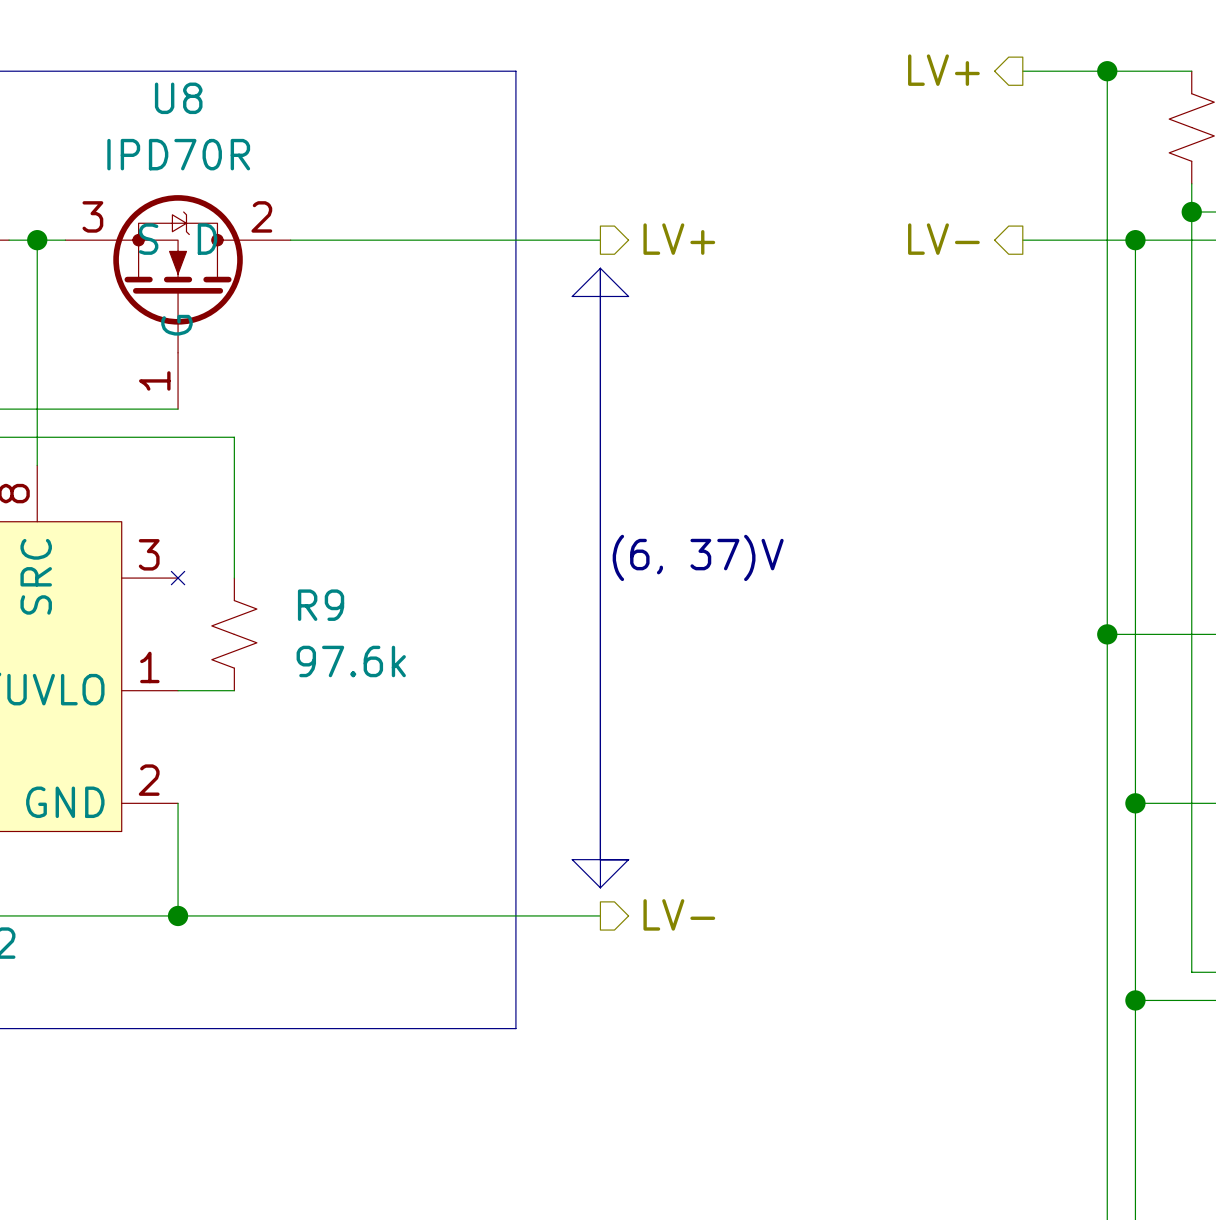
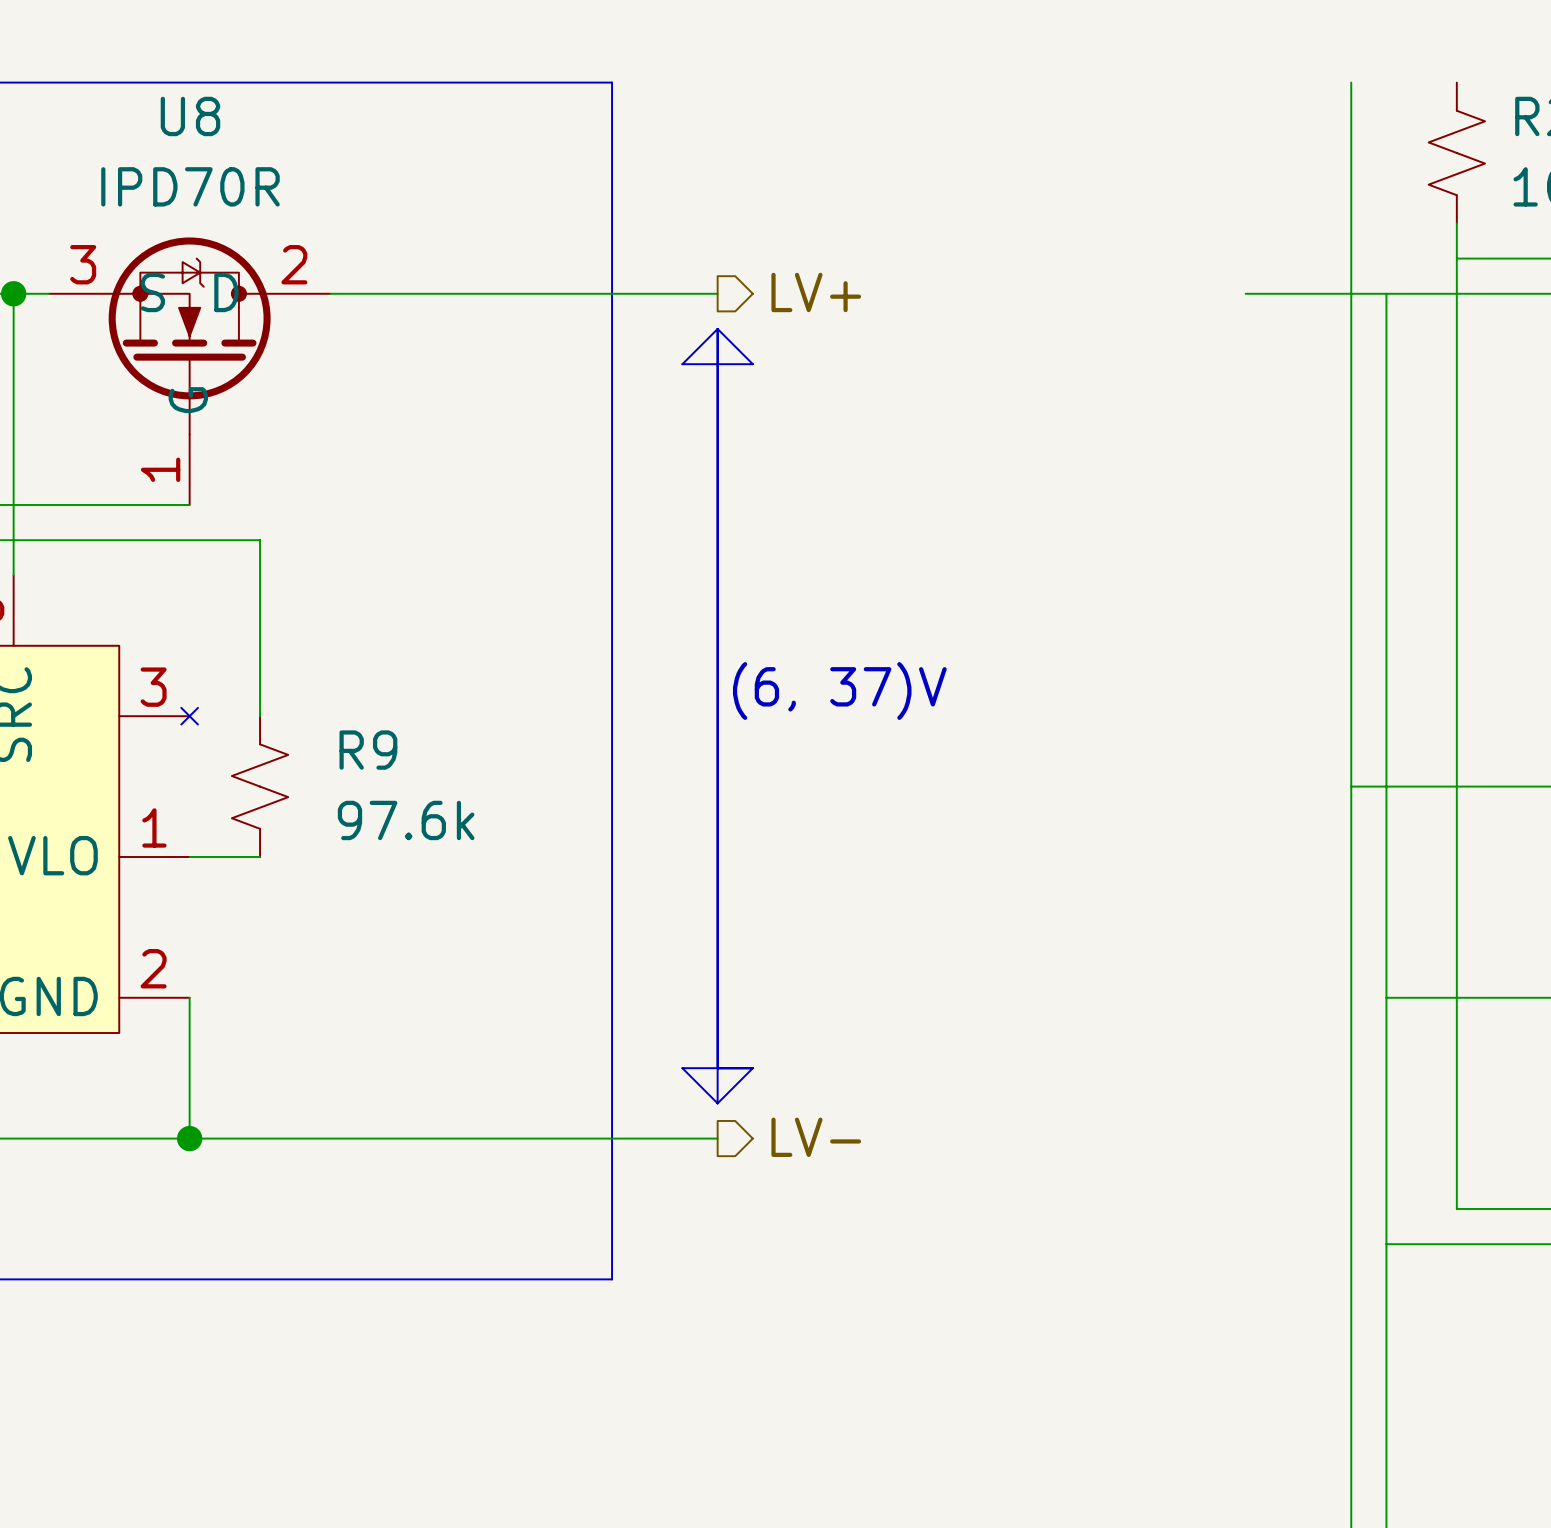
hierarchical label: LV+ (943, 70) -> none
wire: (1022, 71) (1191, 71) -> none
junction: (1107, 71) -> none
junction: (1191, 212) -> none
hierarchical label: LV- (943, 239) -> none
junction: (1135, 240) -> none
junction: (1107, 634) -> none
junction: (1135, 803) -> none
junction: (1135, 1000) -> none

